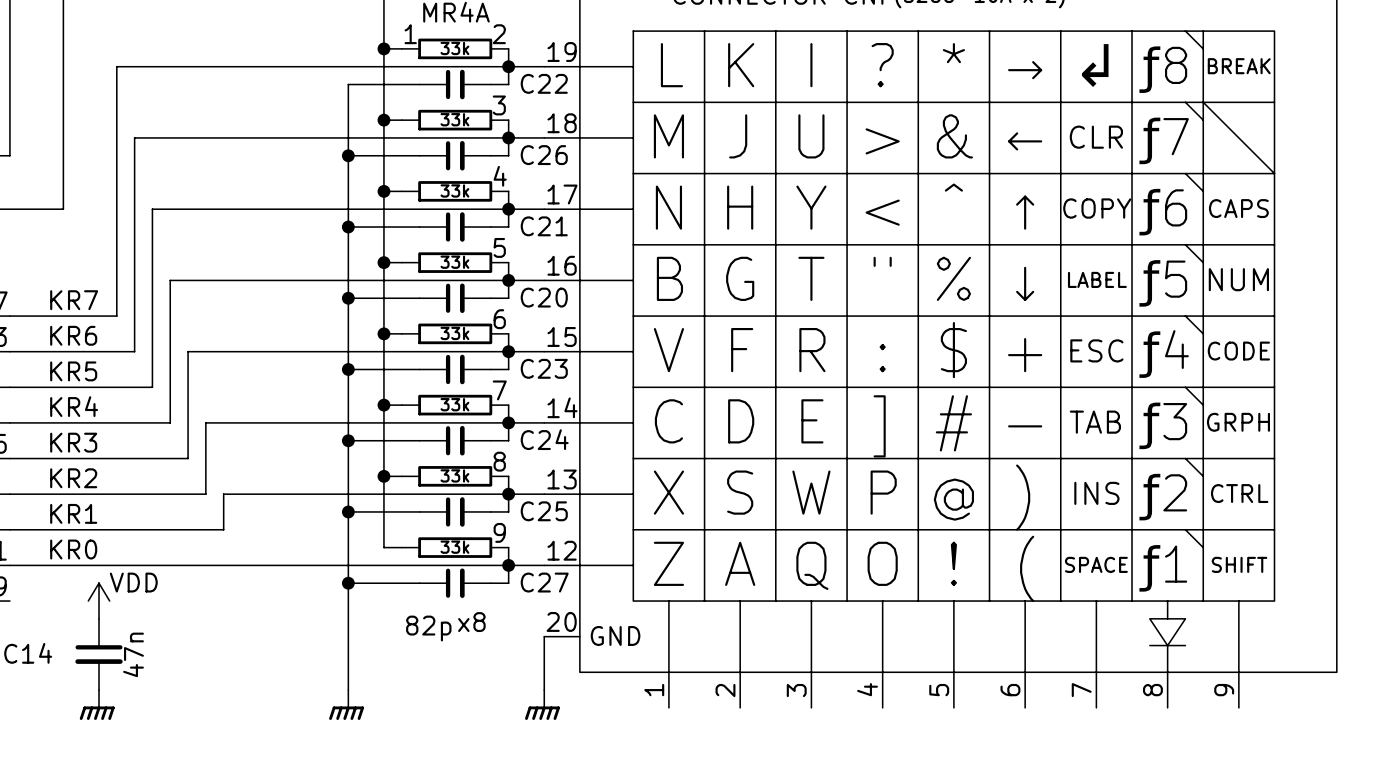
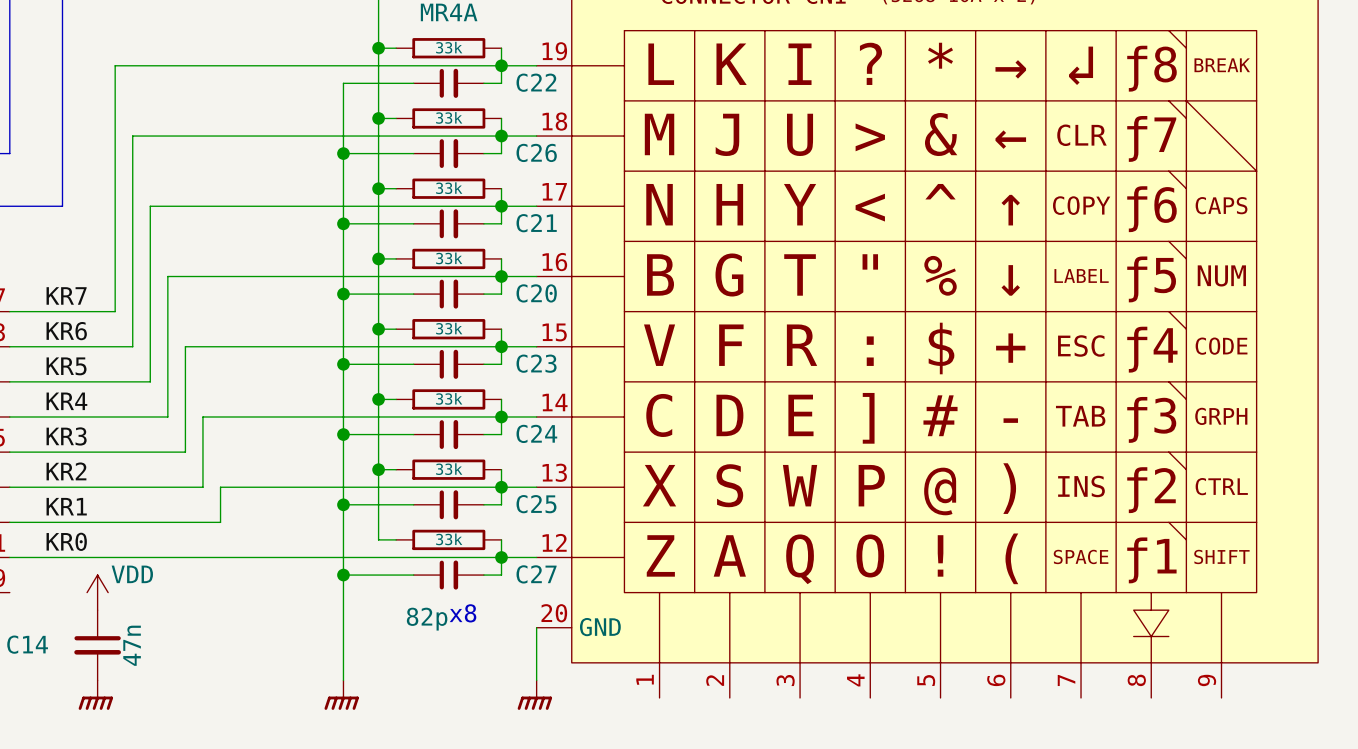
MR4A pin number: 1 (410, 34) -> none
MR4A pin number: 2 (499, 34) -> none
part pin number: 3 (499, 105) -> none
part pin number: 4 (500, 176) -> none
part pin number: 5 (499, 247) -> none
part pin number: 6 (499, 319) -> none
part pin number: 7 (499, 390) -> none
part pin number: 8 (499, 461) -> none
part pin number: 9 (499, 532) -> none

